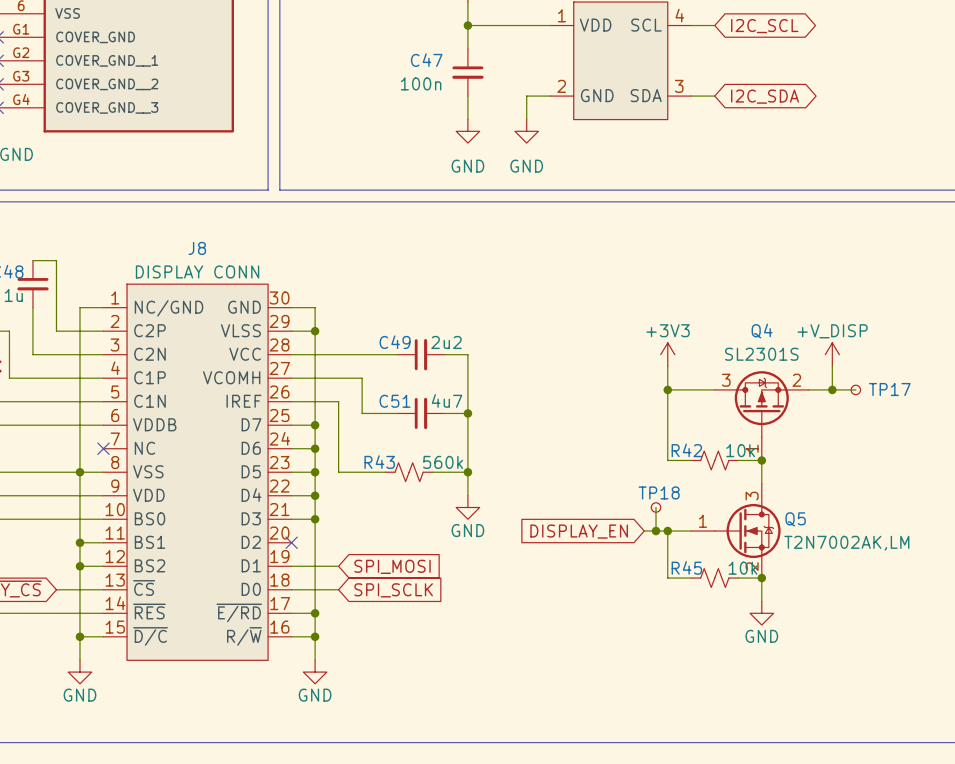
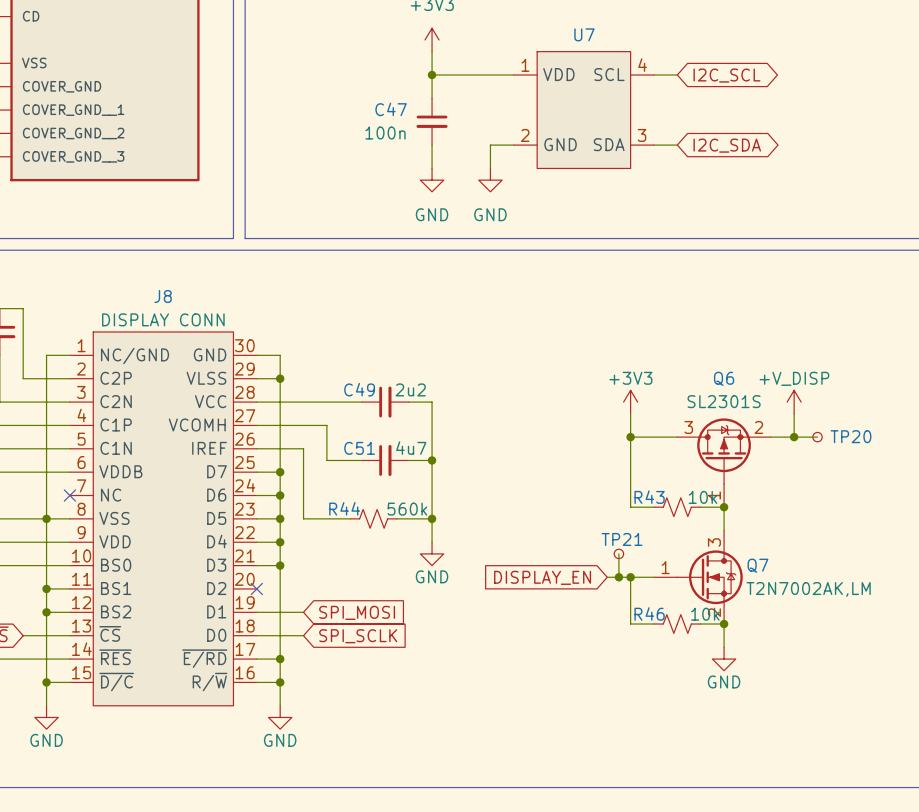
Q4 name: Q4 (762, 331) -> Q6 (724, 378)
TP17 name: TP17 (889, 389) -> TP20 (850, 436)
R42 name: R42 (686, 450) -> R43 (649, 497)
R43 name: R43 (379, 462) -> R44 (344, 508)
TP18 name: TP18 (659, 492) -> TP21 (622, 539)
Q5 name: Q5 (795, 519) -> Q7 (757, 565)
R45 name: R45 (686, 567) -> R46 (649, 613)

